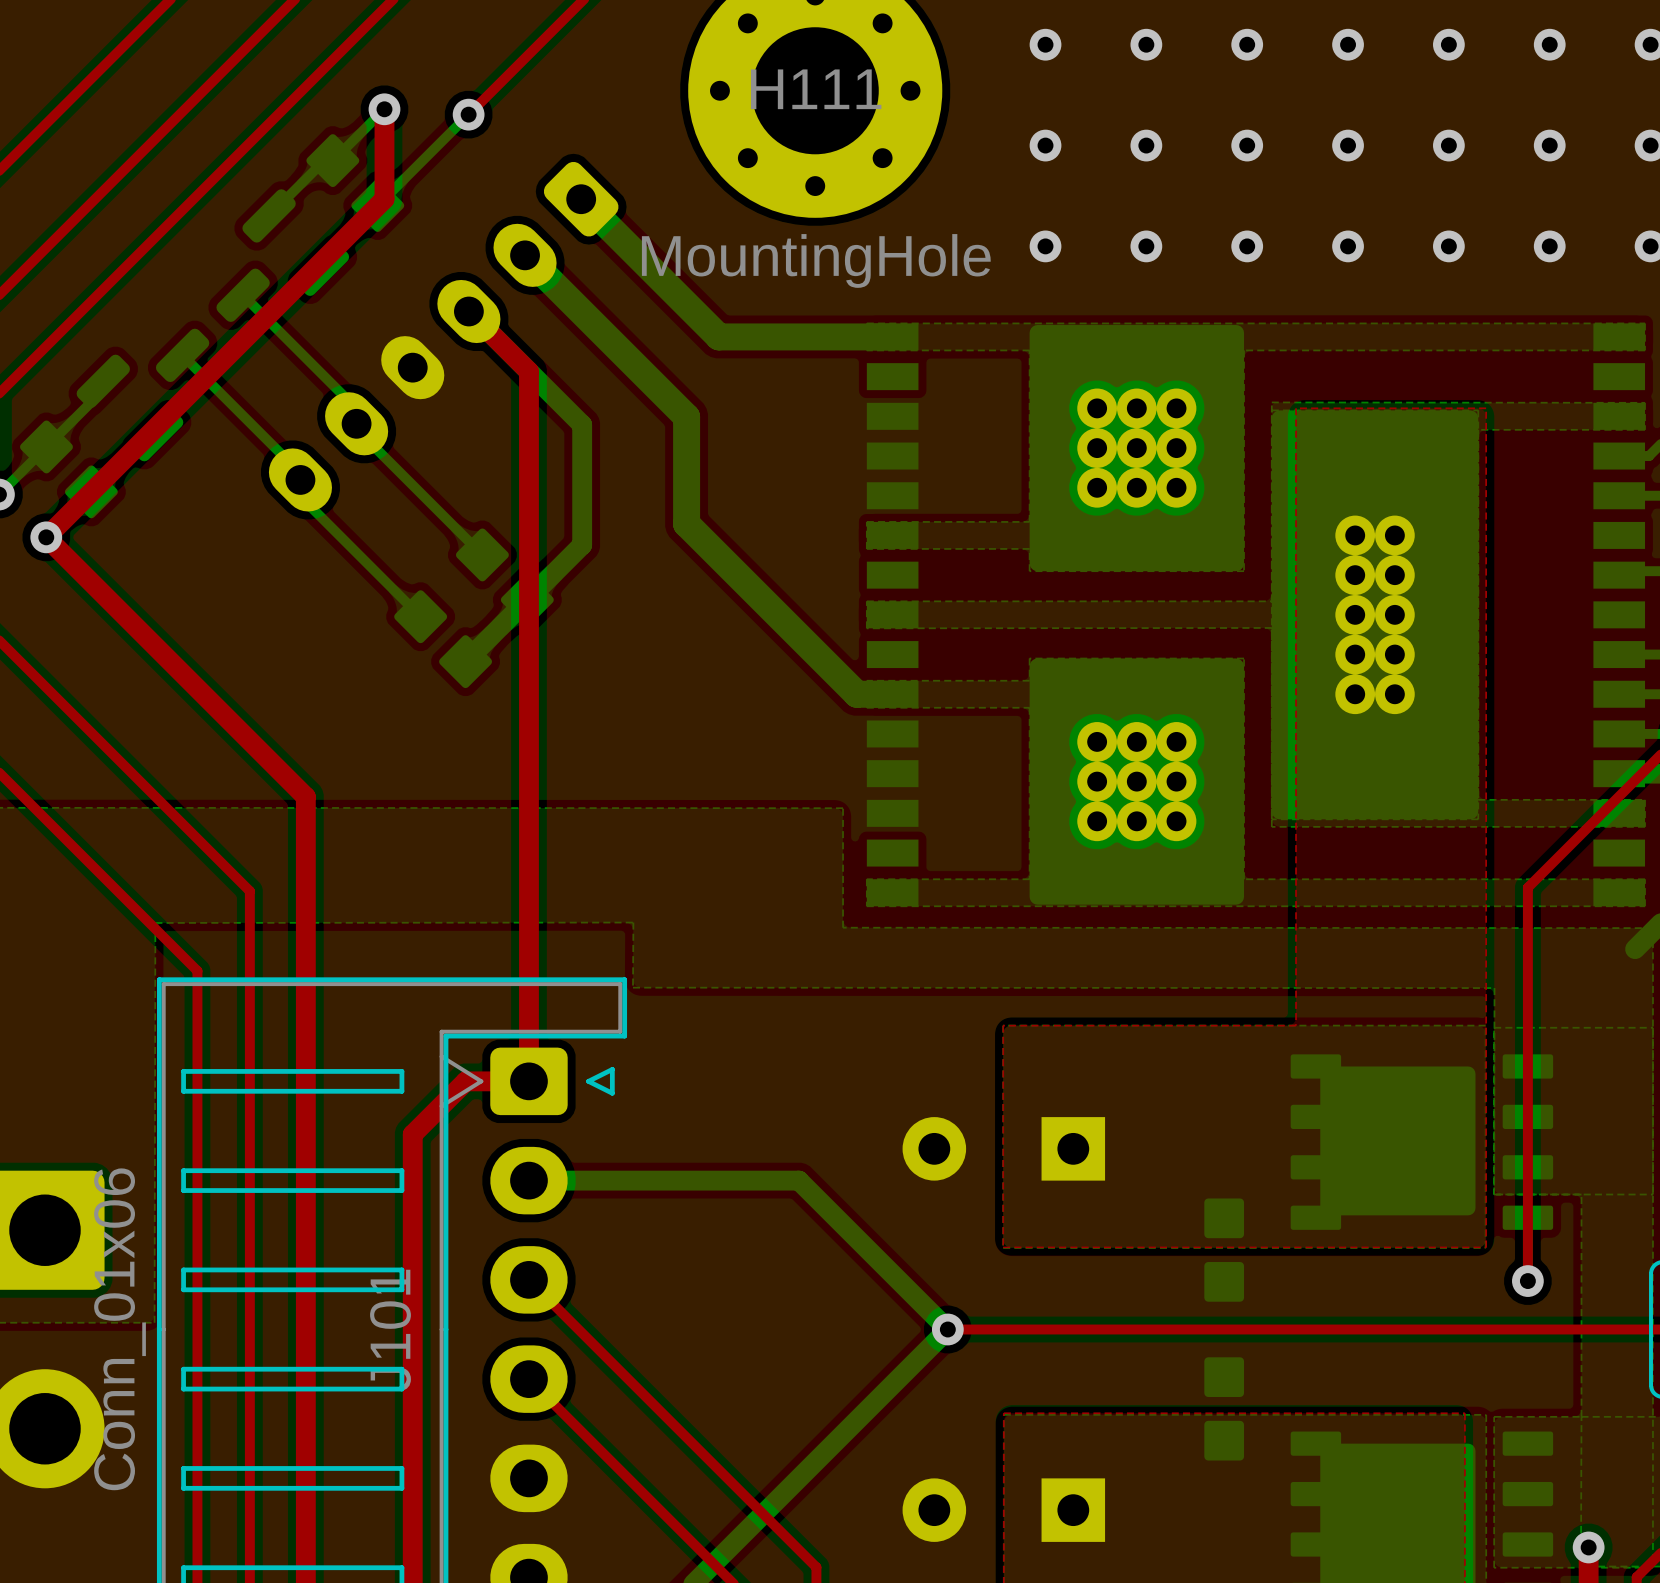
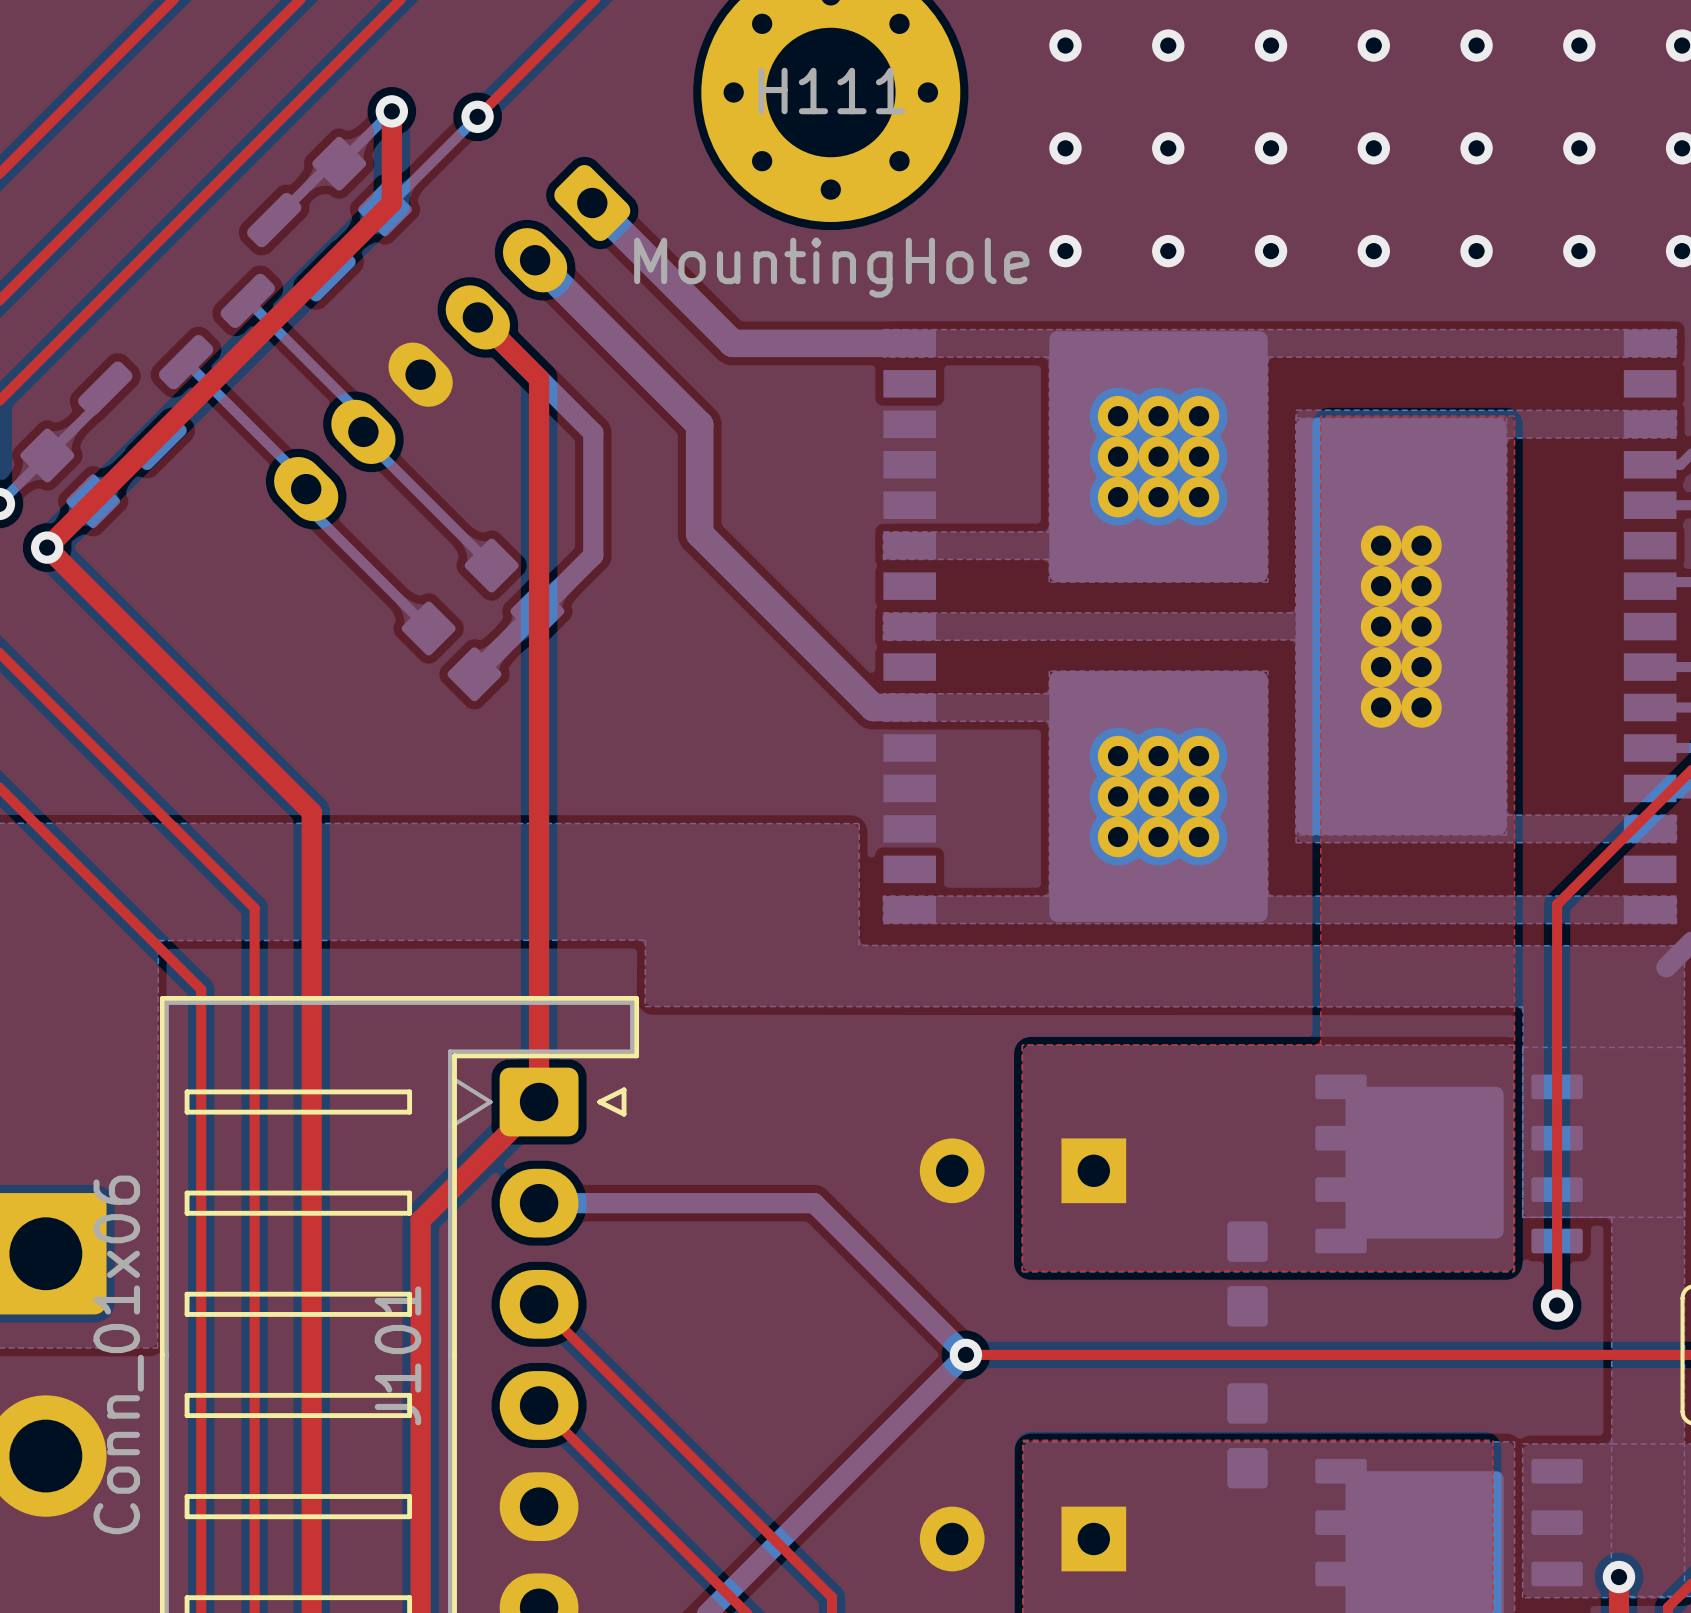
top track: (528, 1081) (465, 1081) (412, 1134) (412, 1197) -> (539, 1102) (420, 1220)

